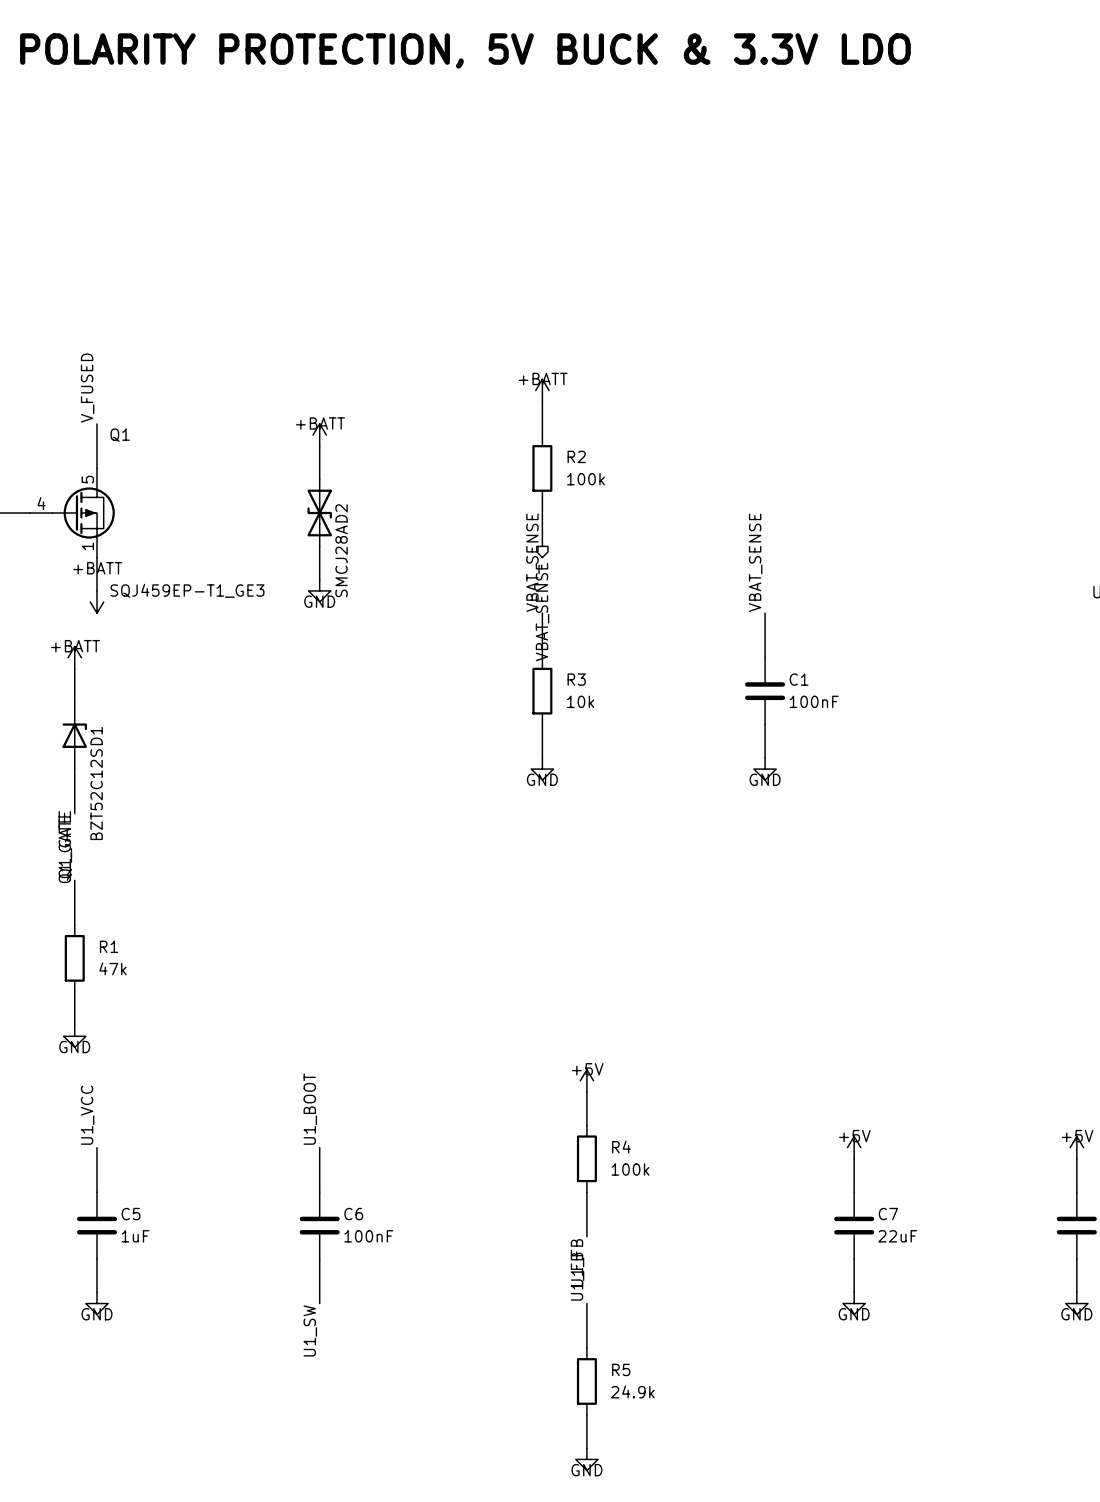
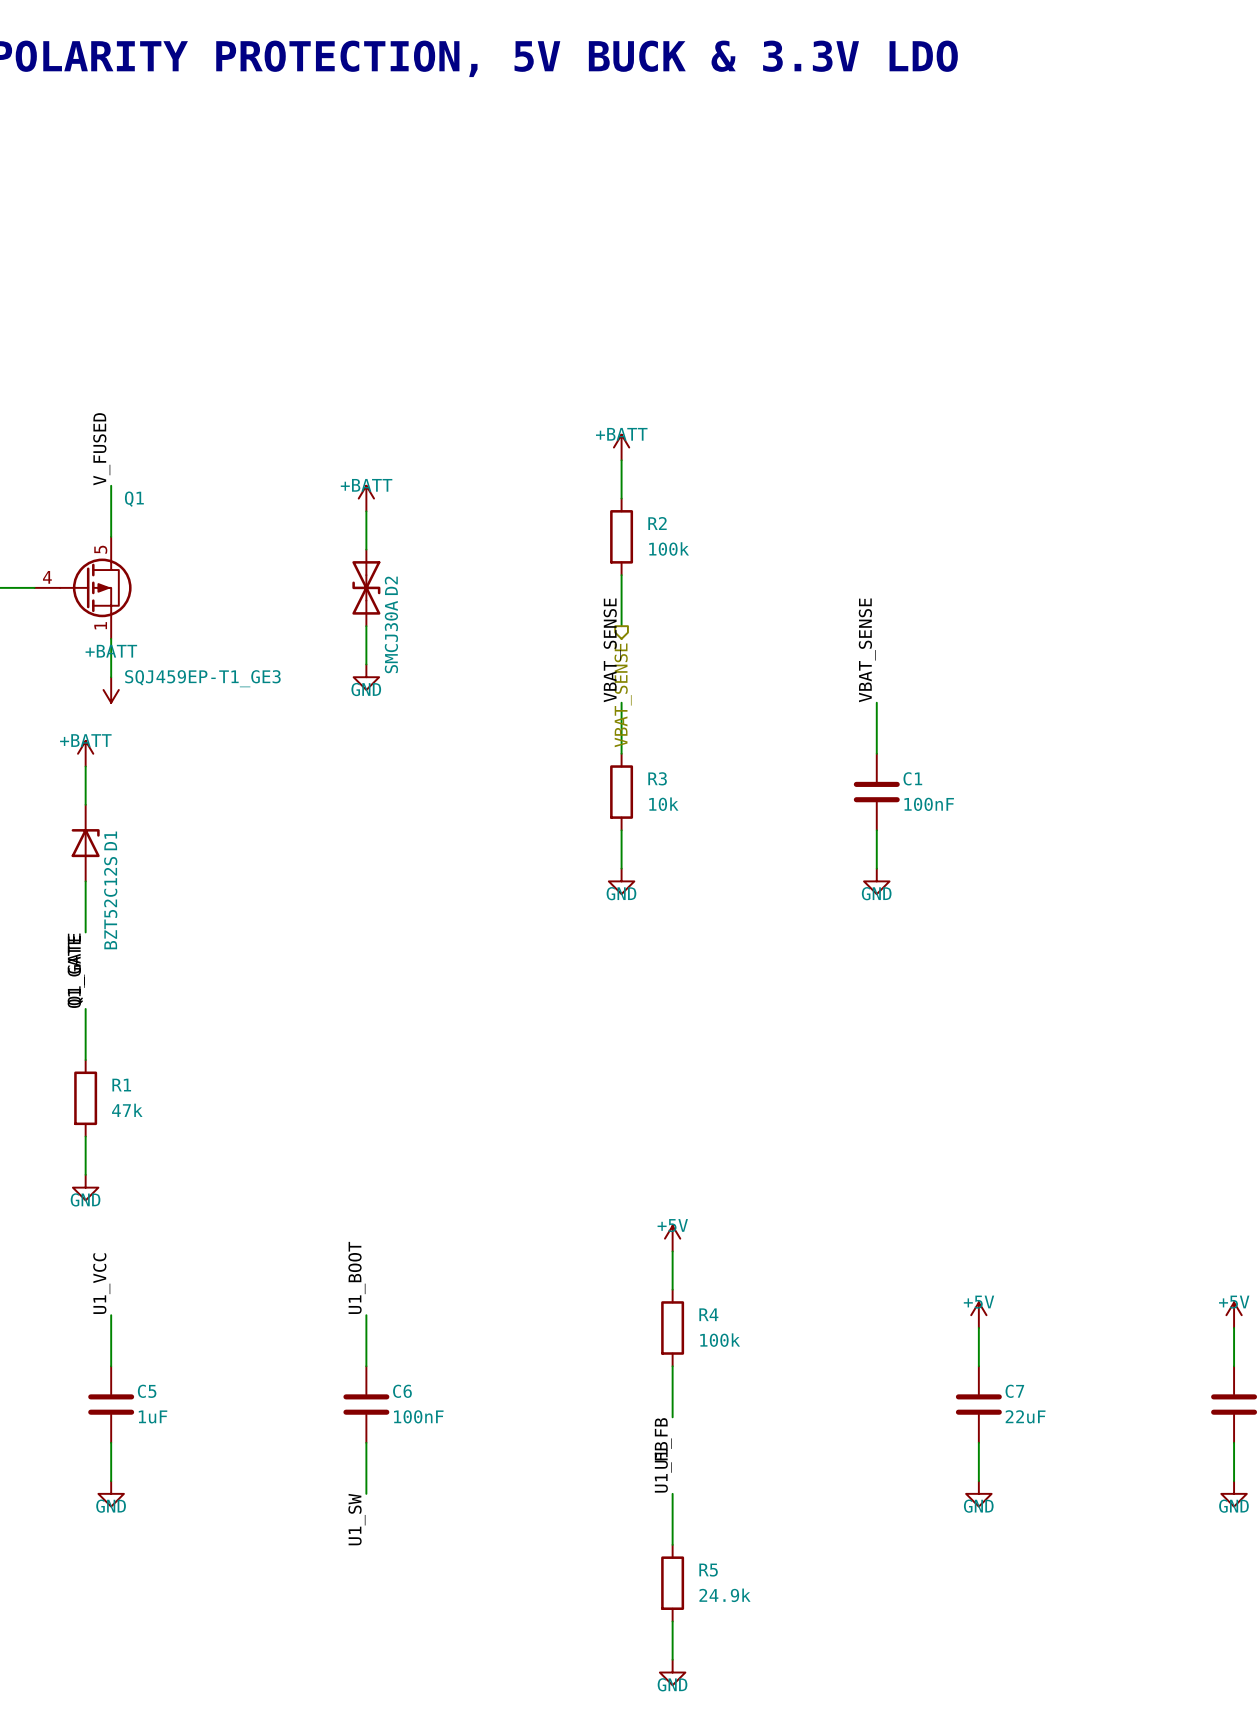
D2 value: SMCJ28A (341, 561) -> SMCJ30A (391, 637)

